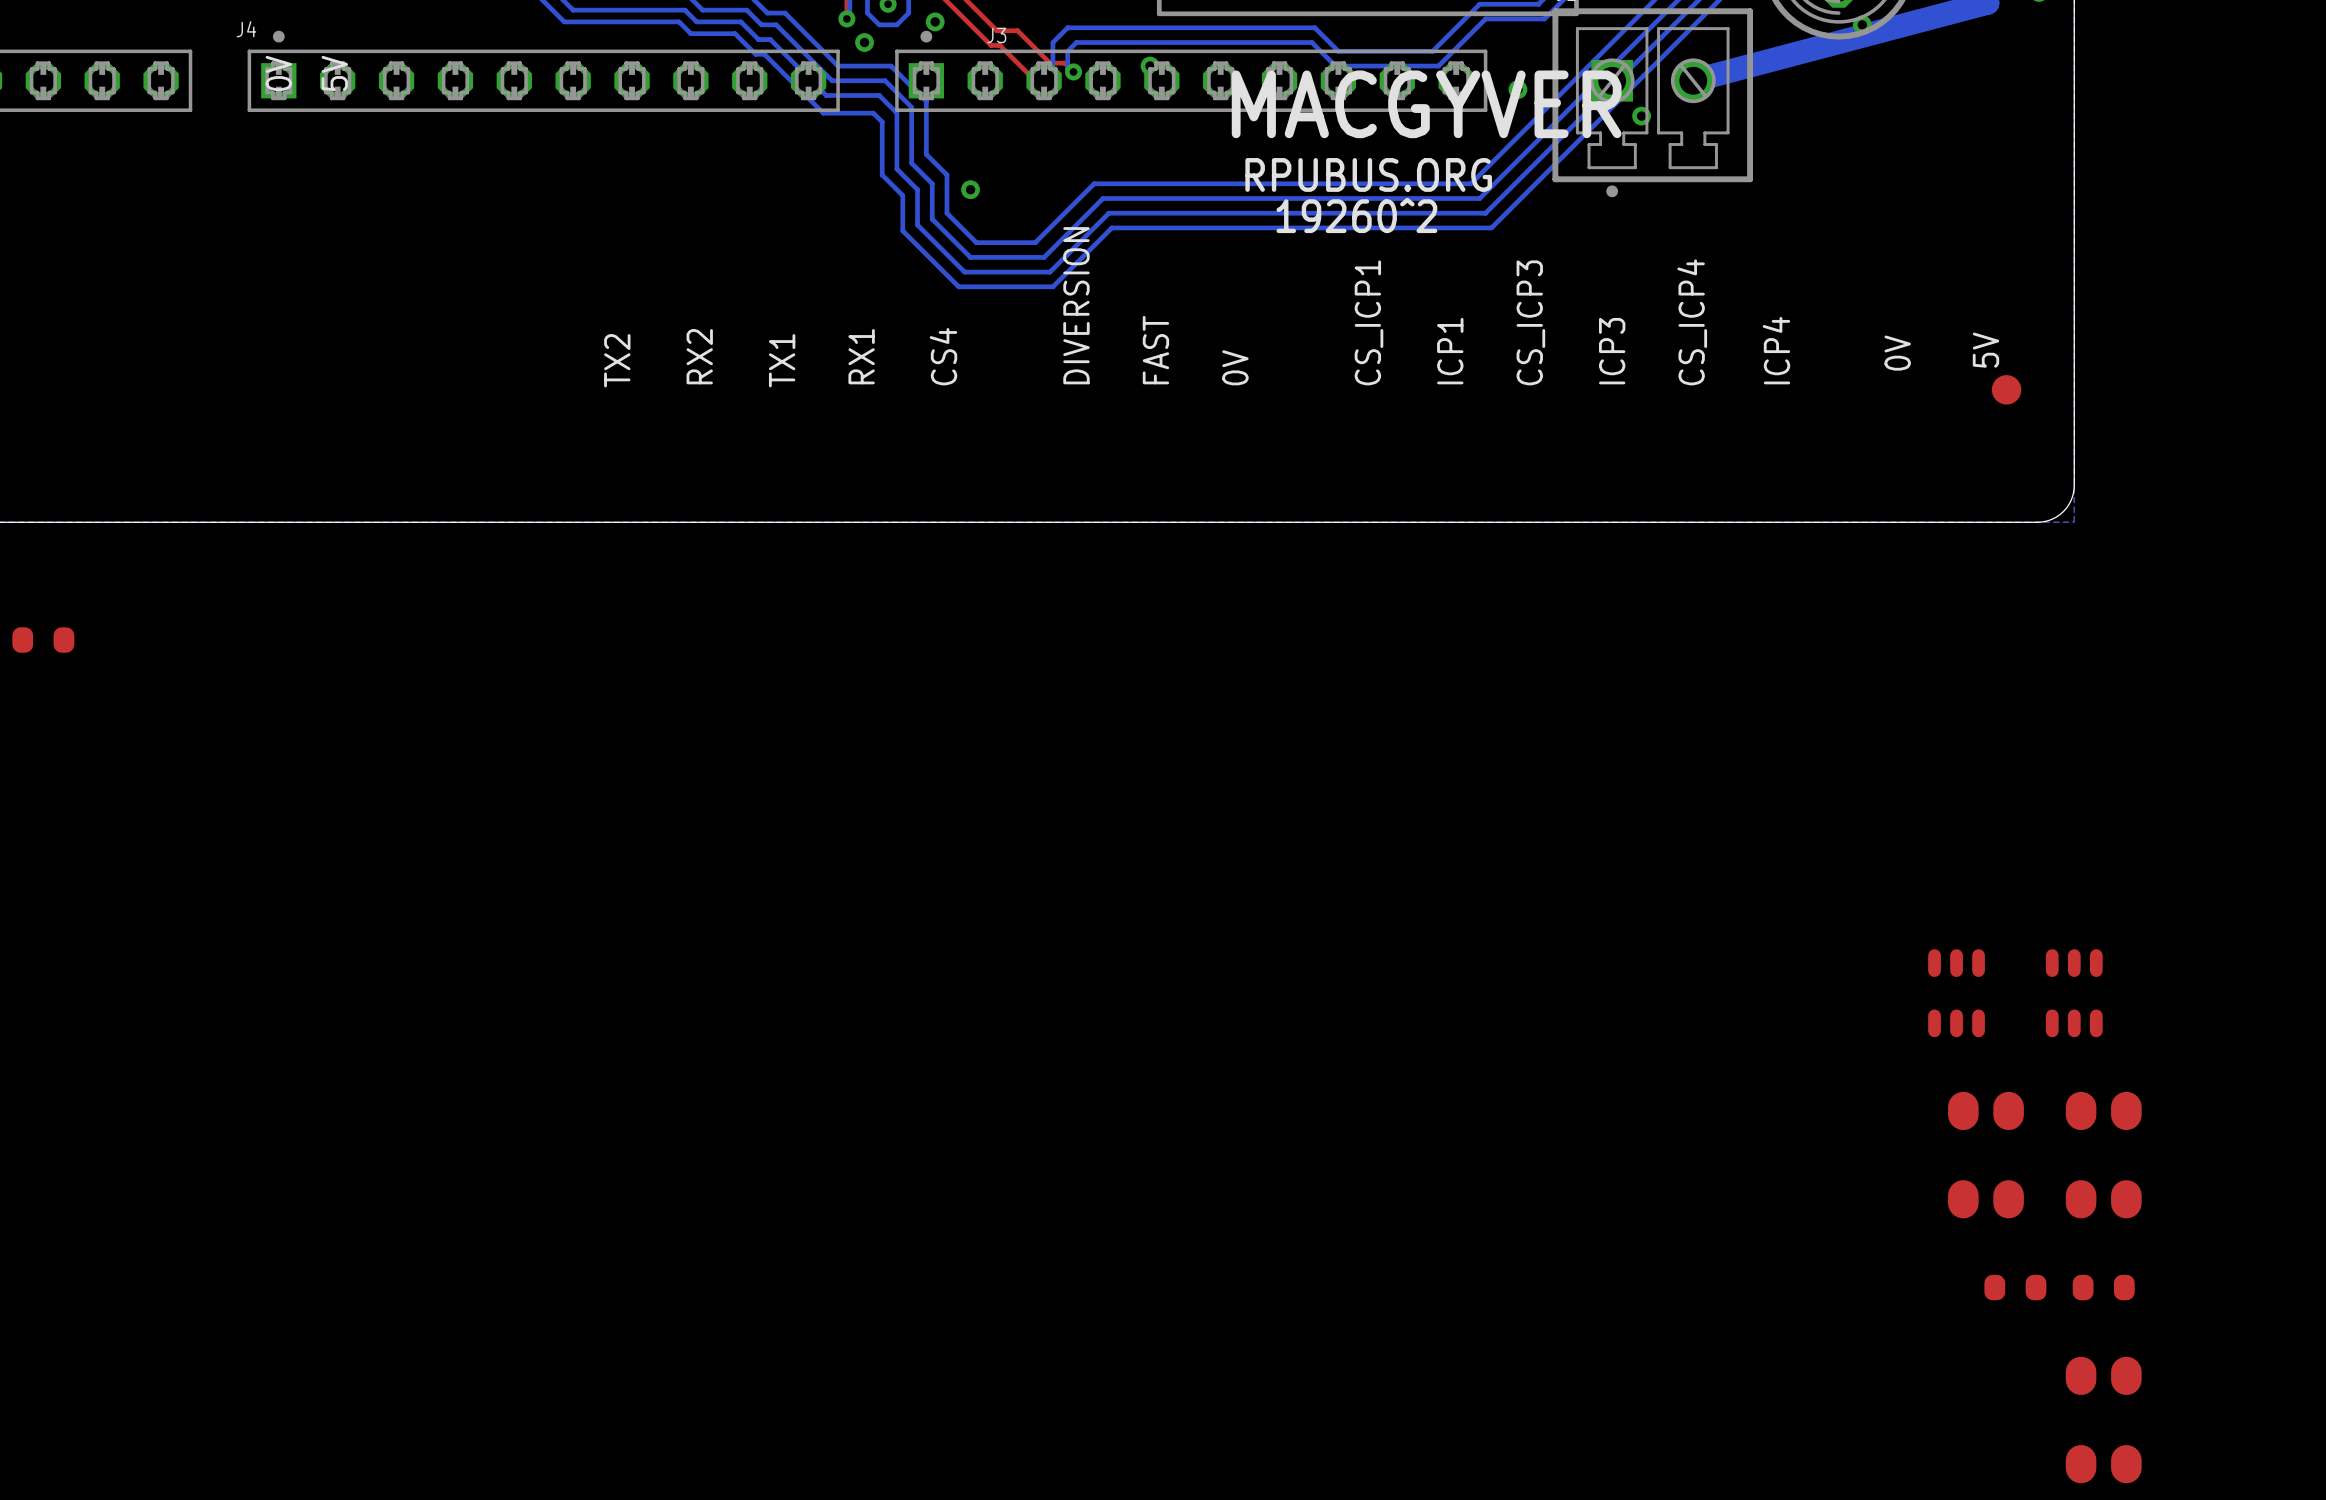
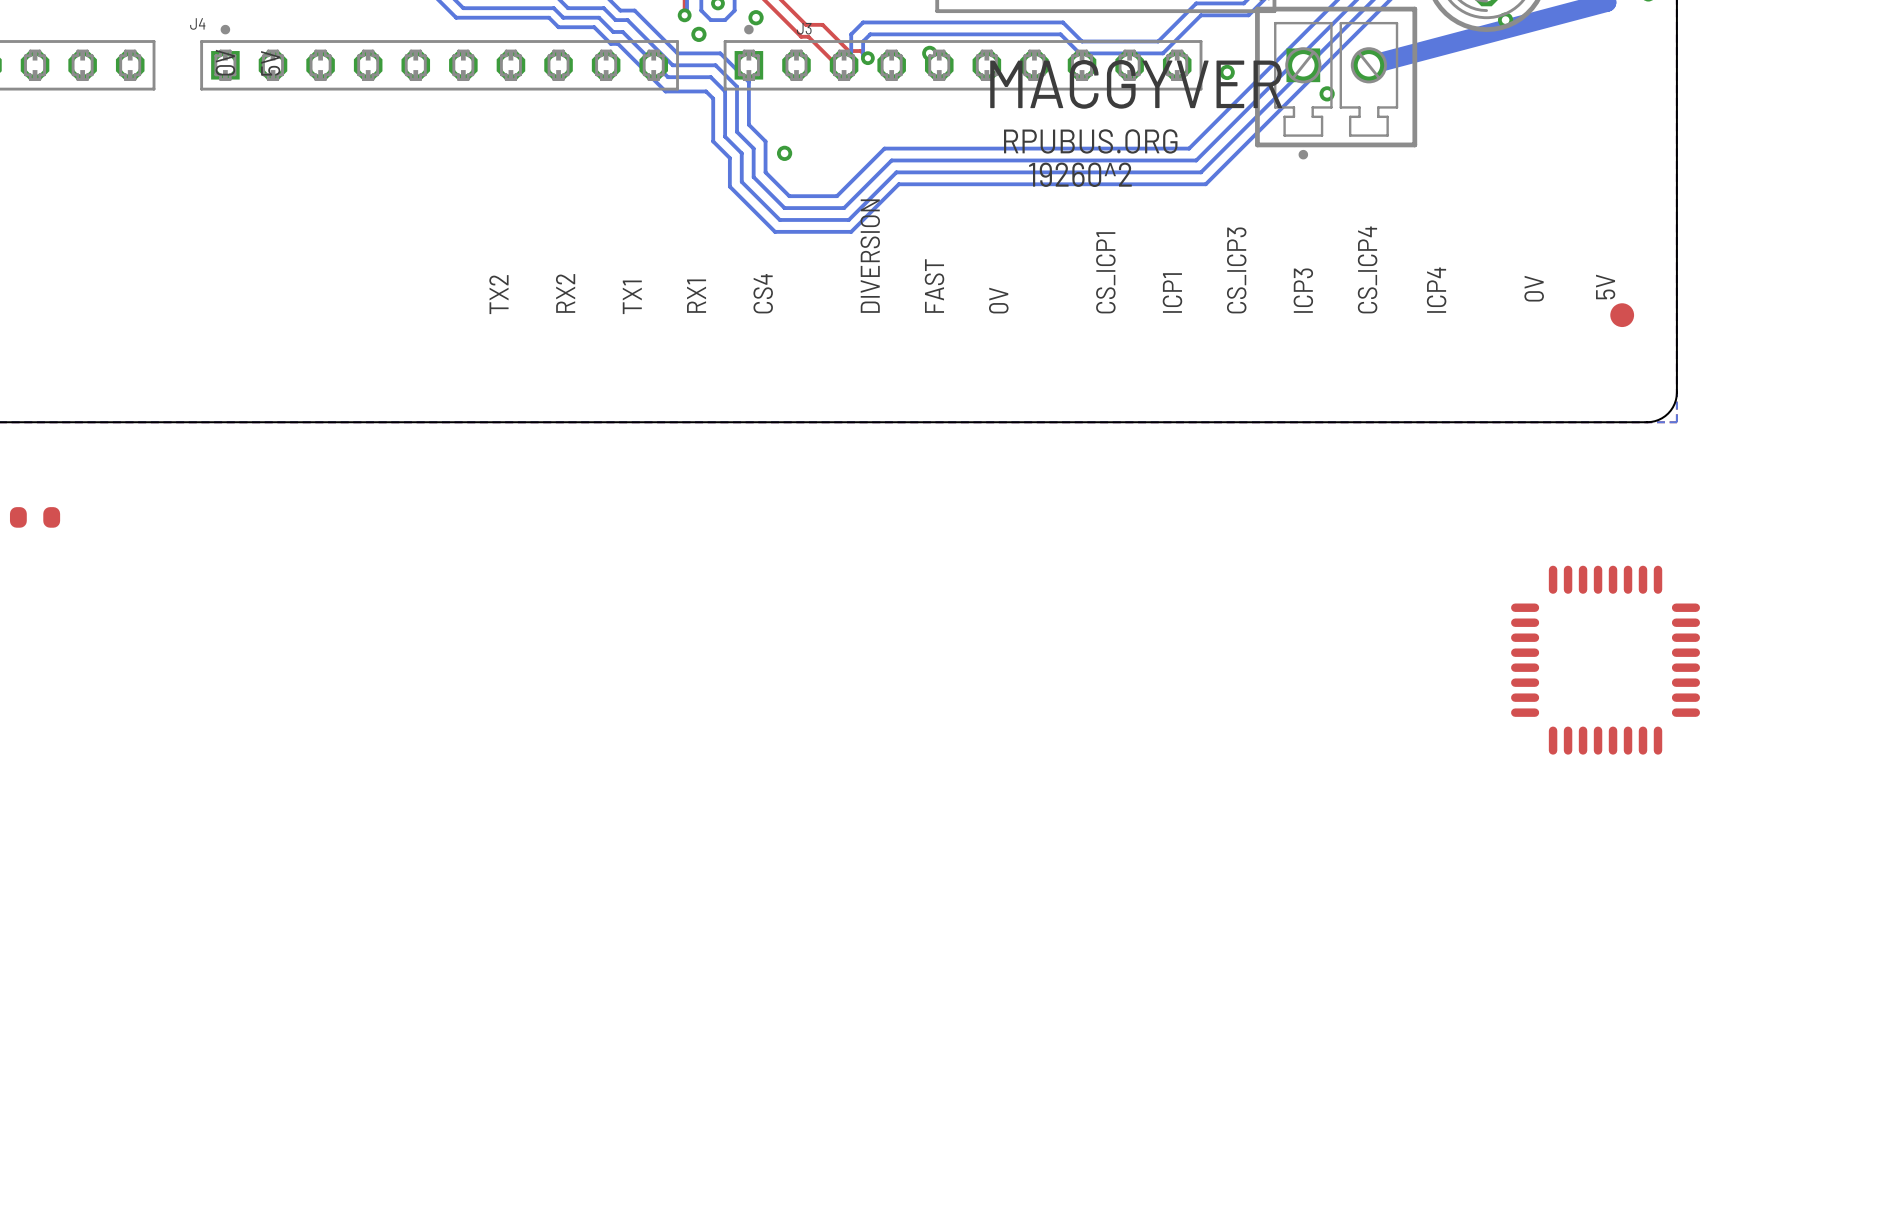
part: none -> (1605, 660)
part: (1956, 993) -> none
part: (2074, 993) -> none
part: (1985, 1110) -> none
part: (2103, 1110) -> none
part: (1985, 1199) -> none
part: (2103, 1199) -> none
part: (2015, 1287) -> none
part: (2103, 1287) -> none
part: (2103, 1375) -> none
part: (2103, 1464) -> none

